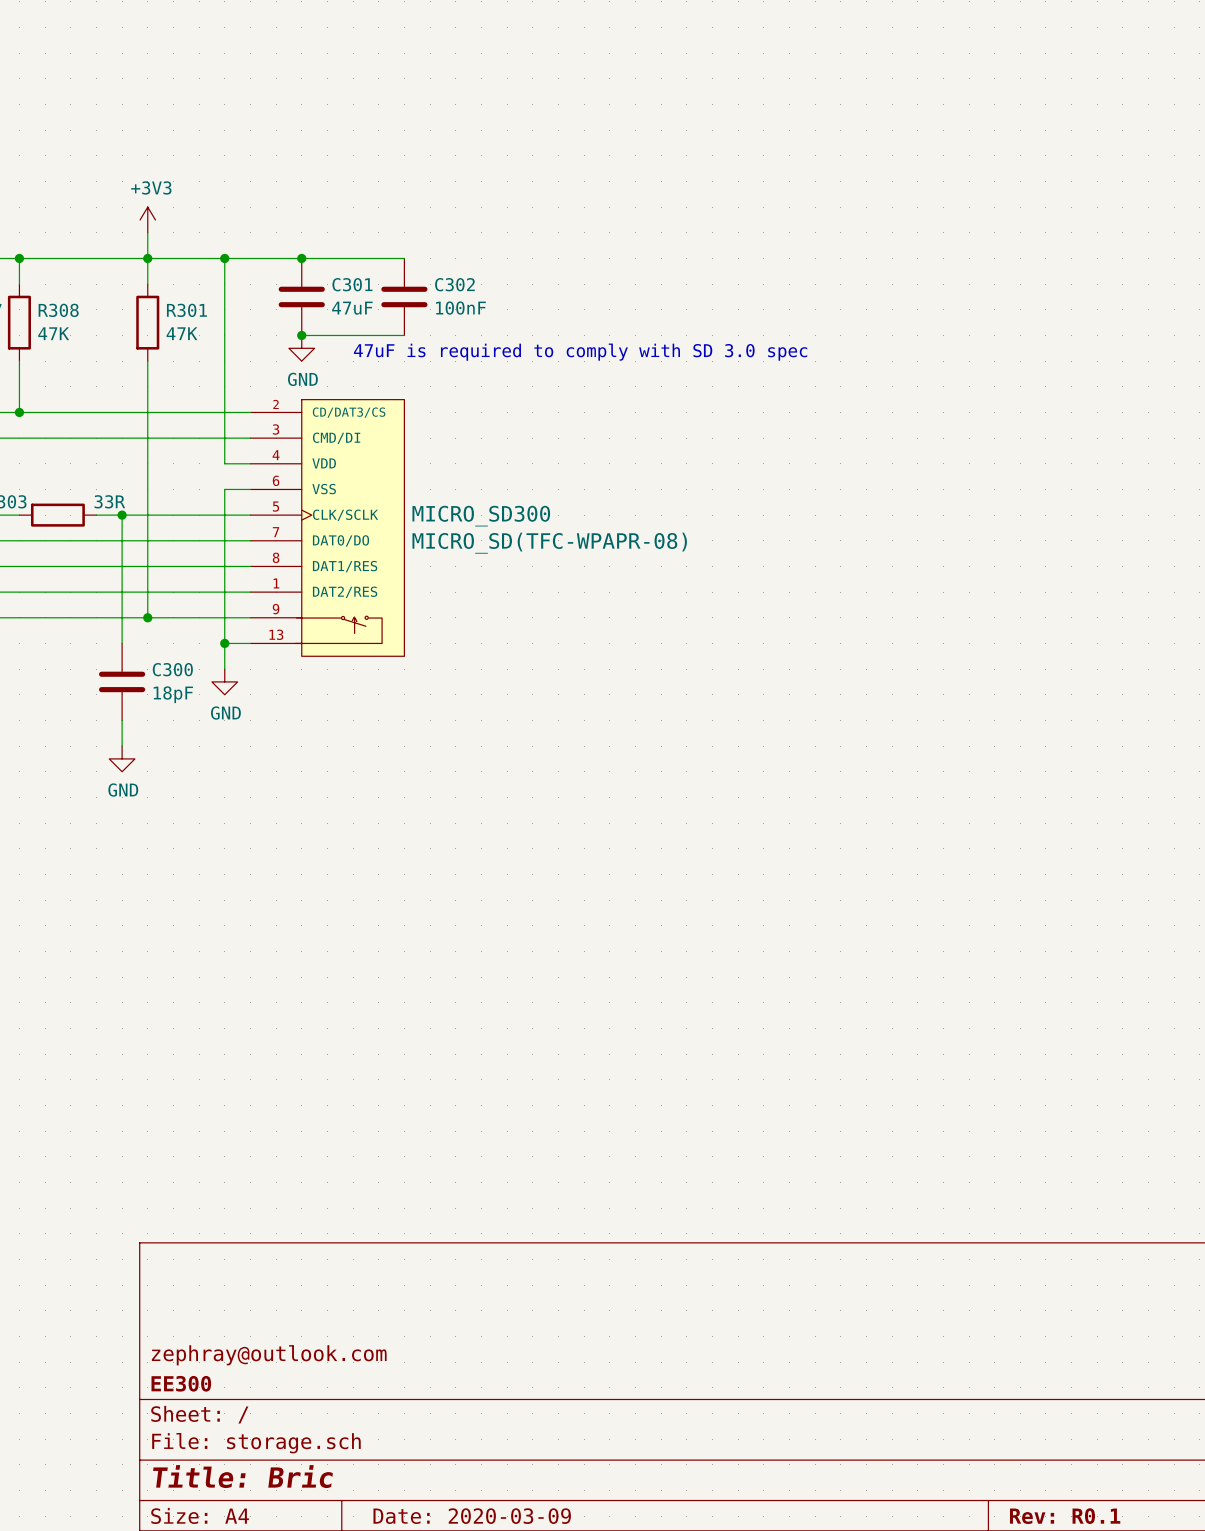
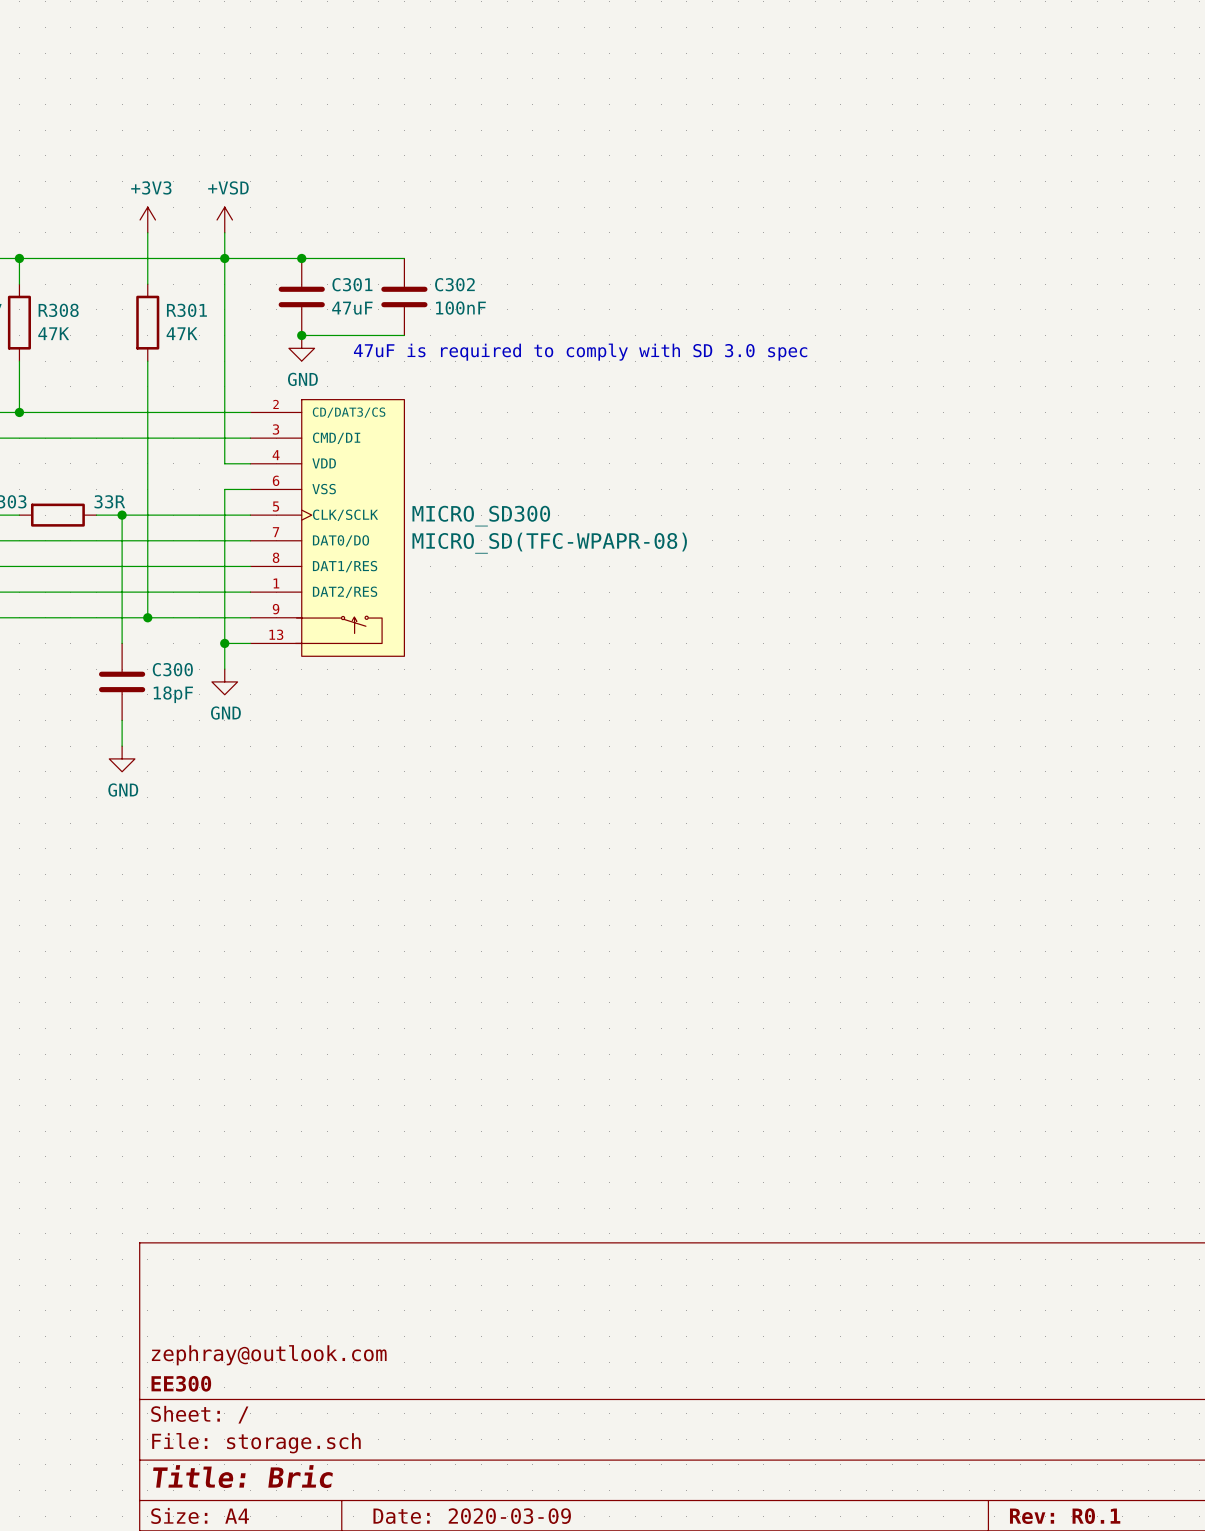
power symbol: none -> +VSD (224, 219)
wire: none -> (224, 232) (224, 258)
junction: (147, 258) -> none

